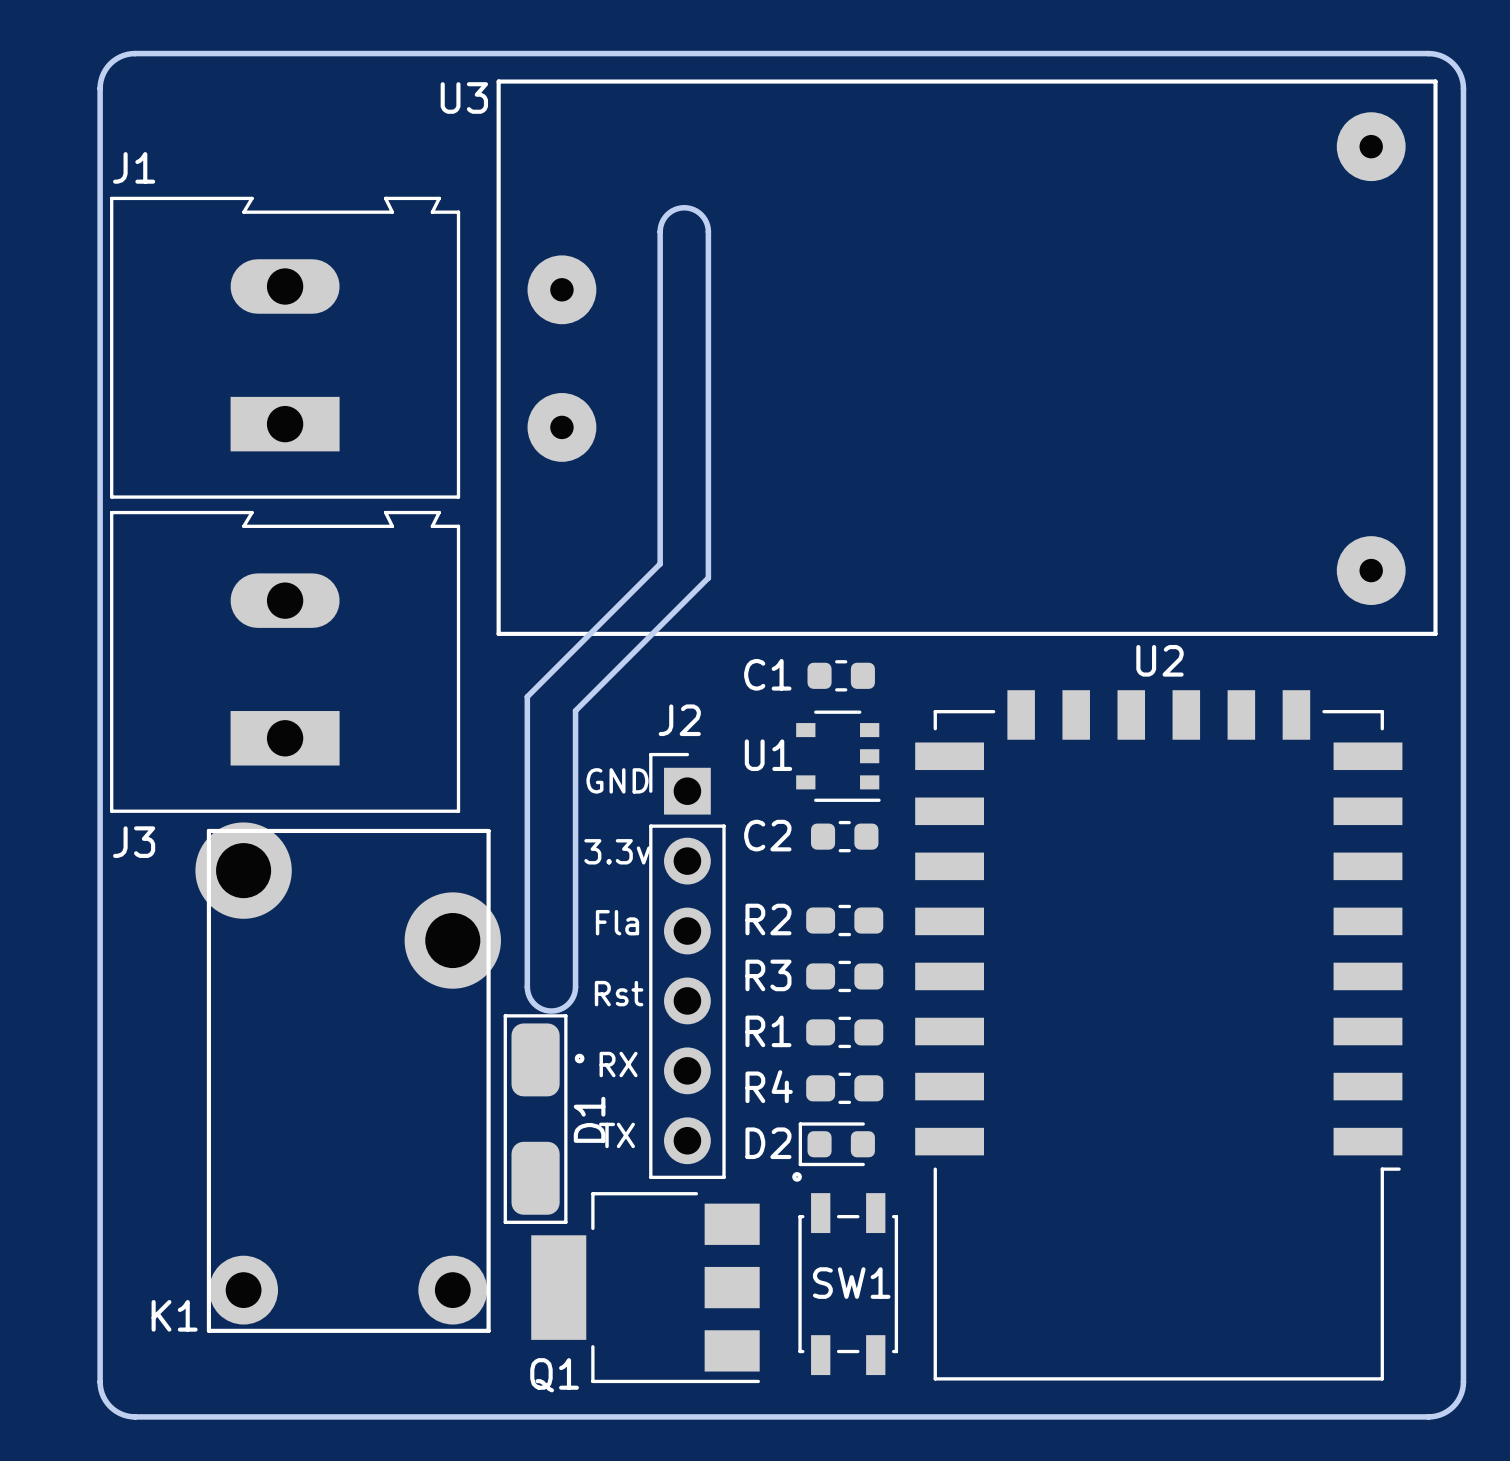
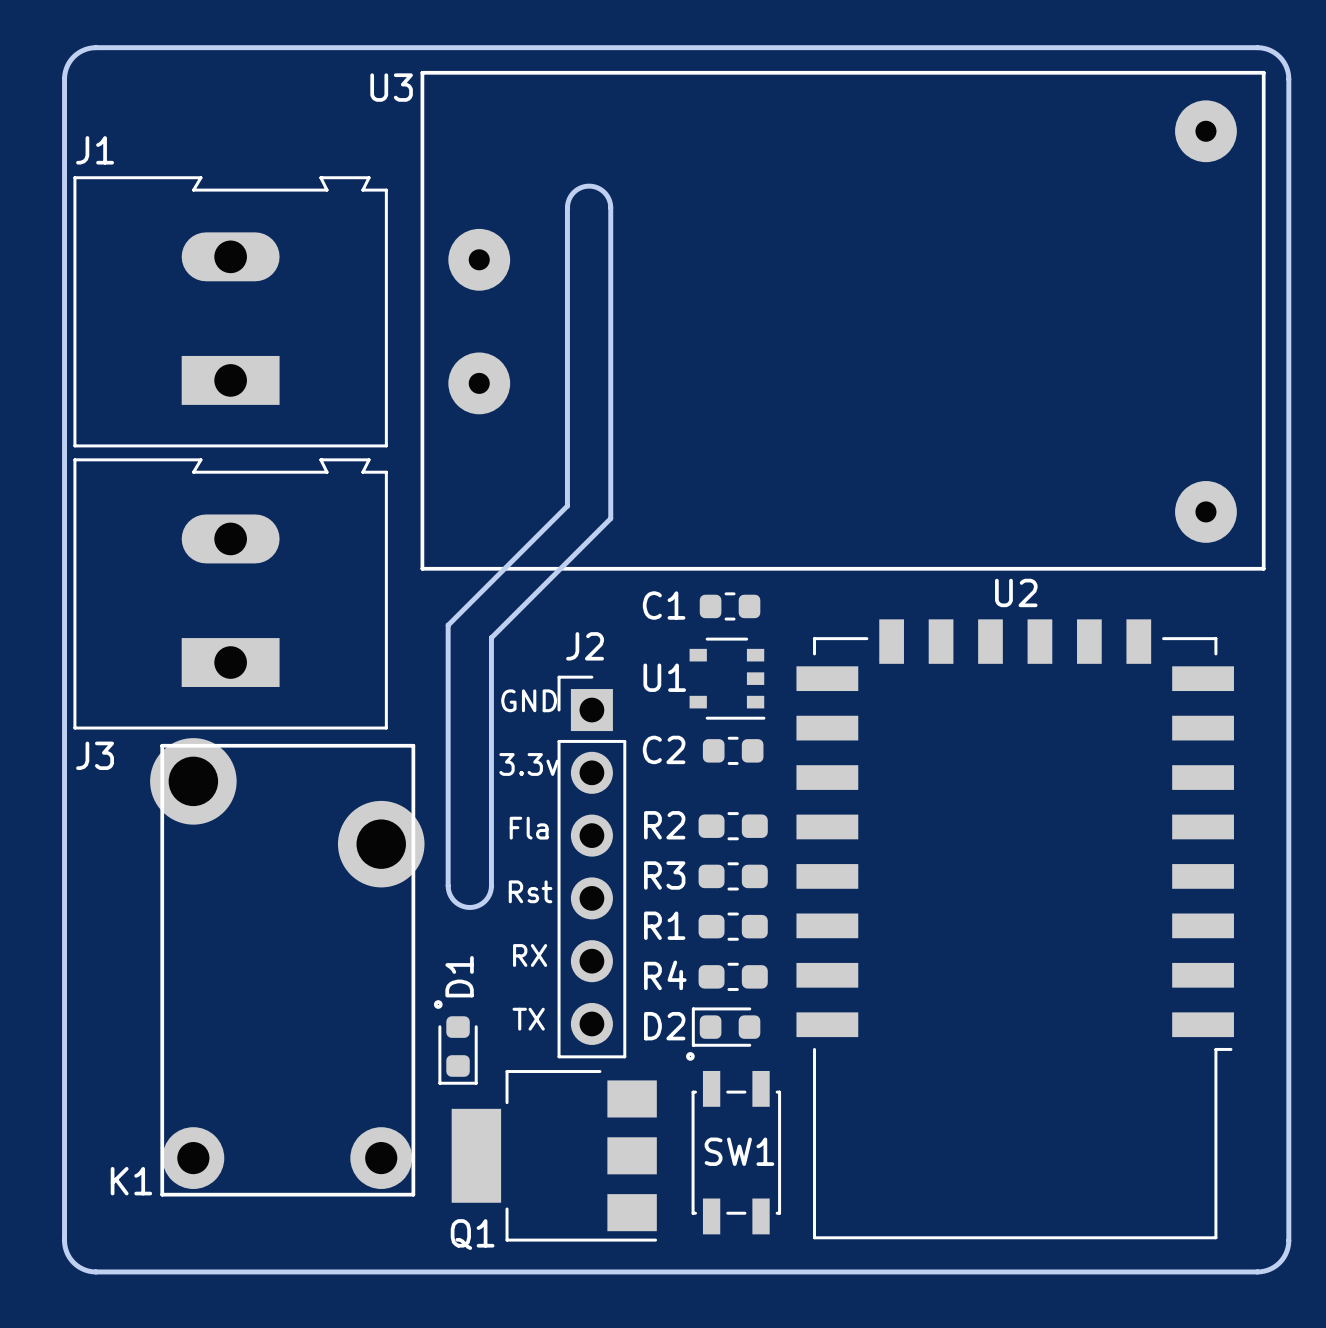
D1 footprint: [503, 1014, 568, 1224] -> [438, 1016, 478, 1085]
drawing position: (579, 1058) -> (438, 1004)
D1 name position: D1 (589, 1119) -> D1 (459, 976)

